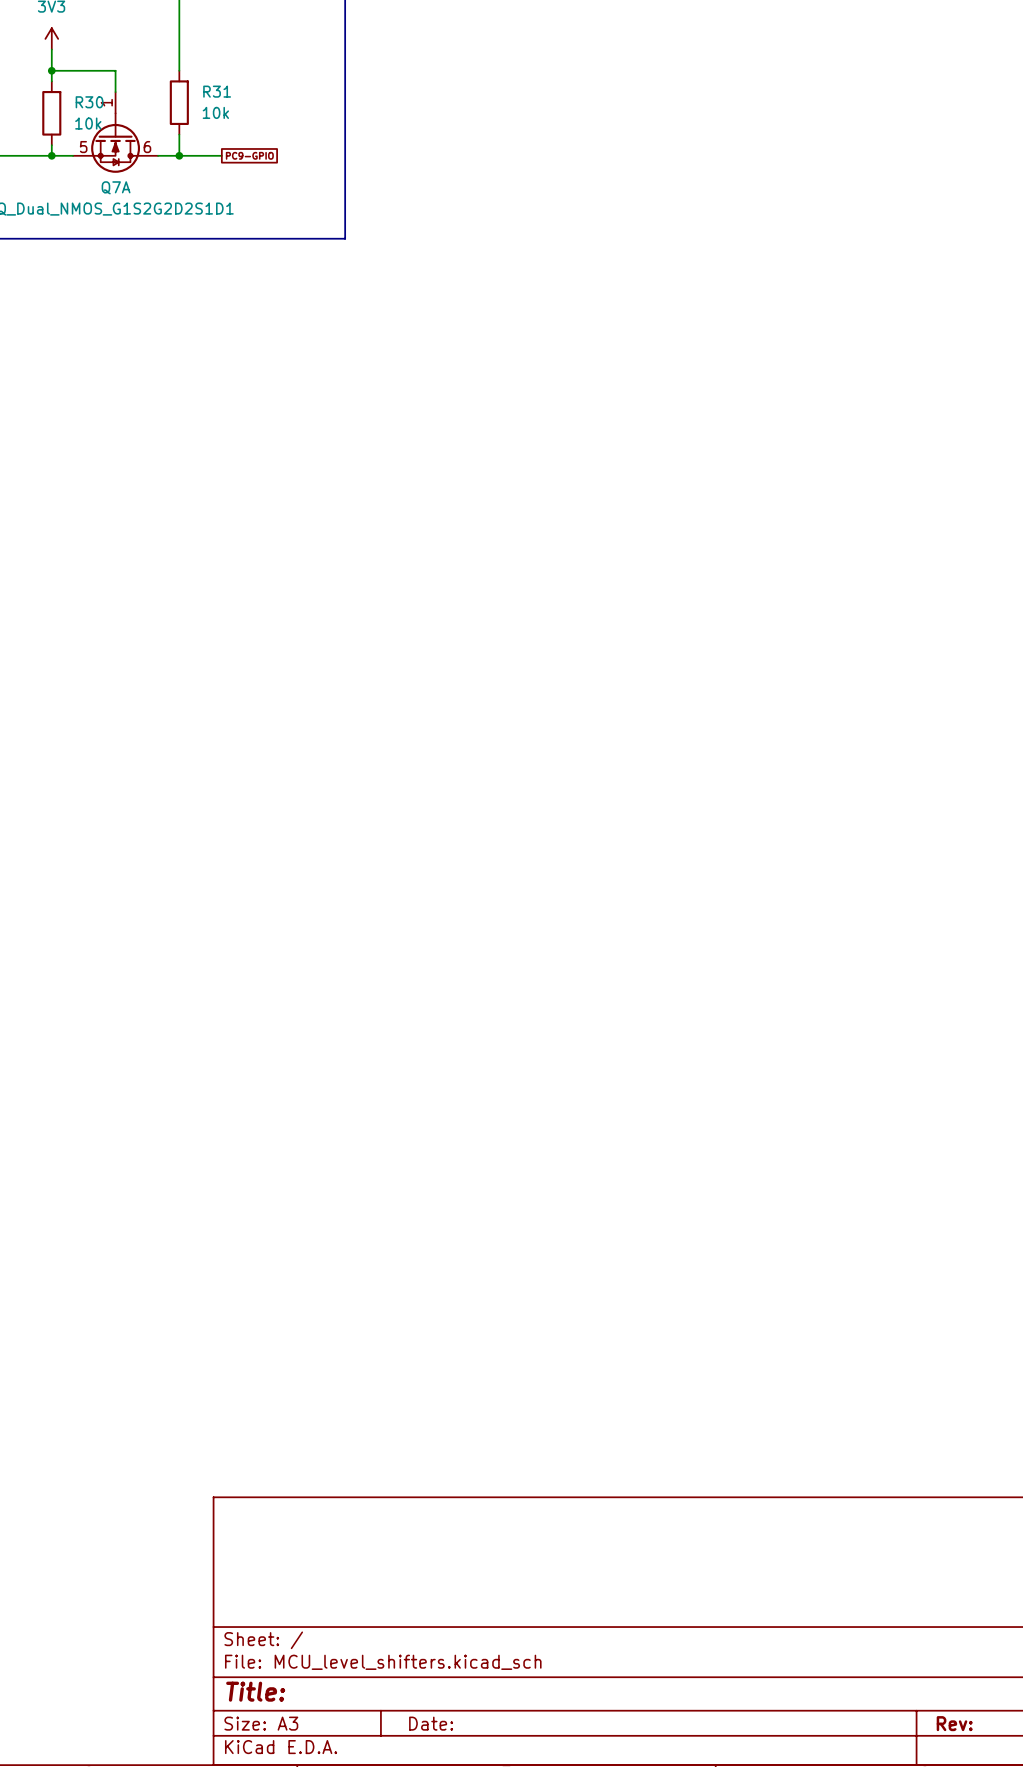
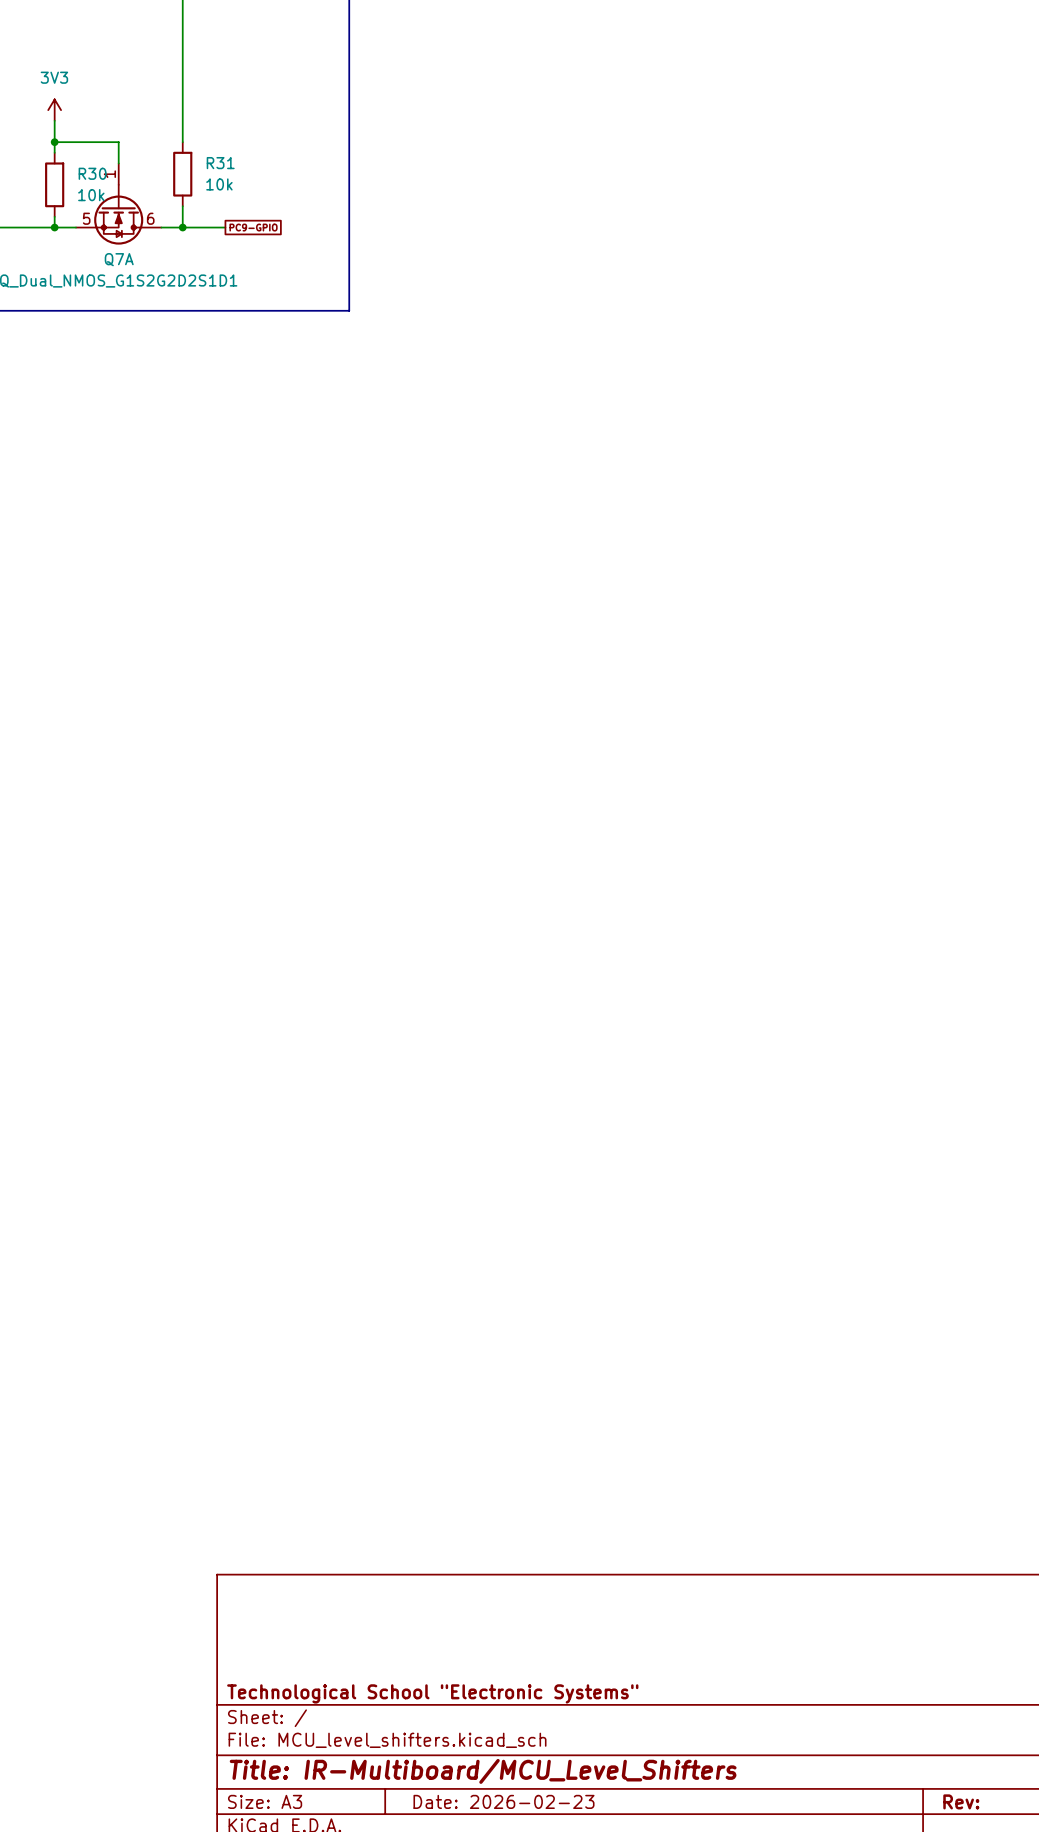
title block: none -> Technological School "Electronic Systems" (432, 1693)
title block: Title: (255, 1691) -> Title: IR-Multiboard/MCU_Level_Shifters (483, 1771)
title block: Date: (431, 1723) -> Date: 2026-02-23 (503, 1801)

